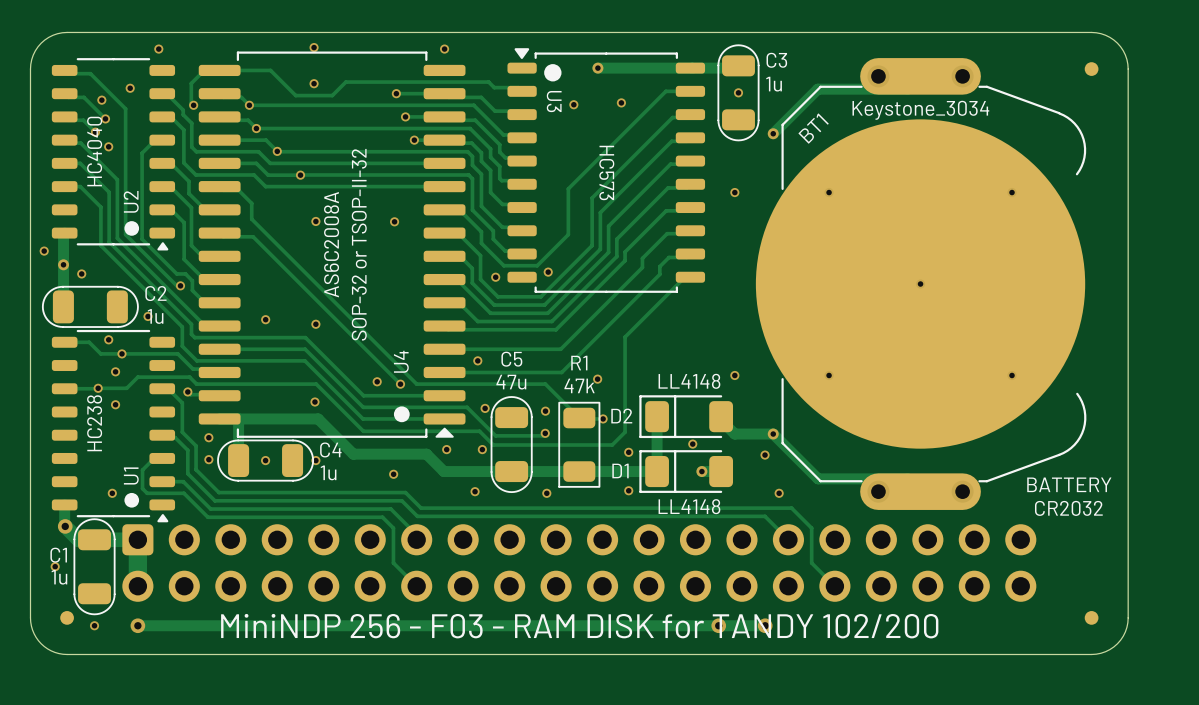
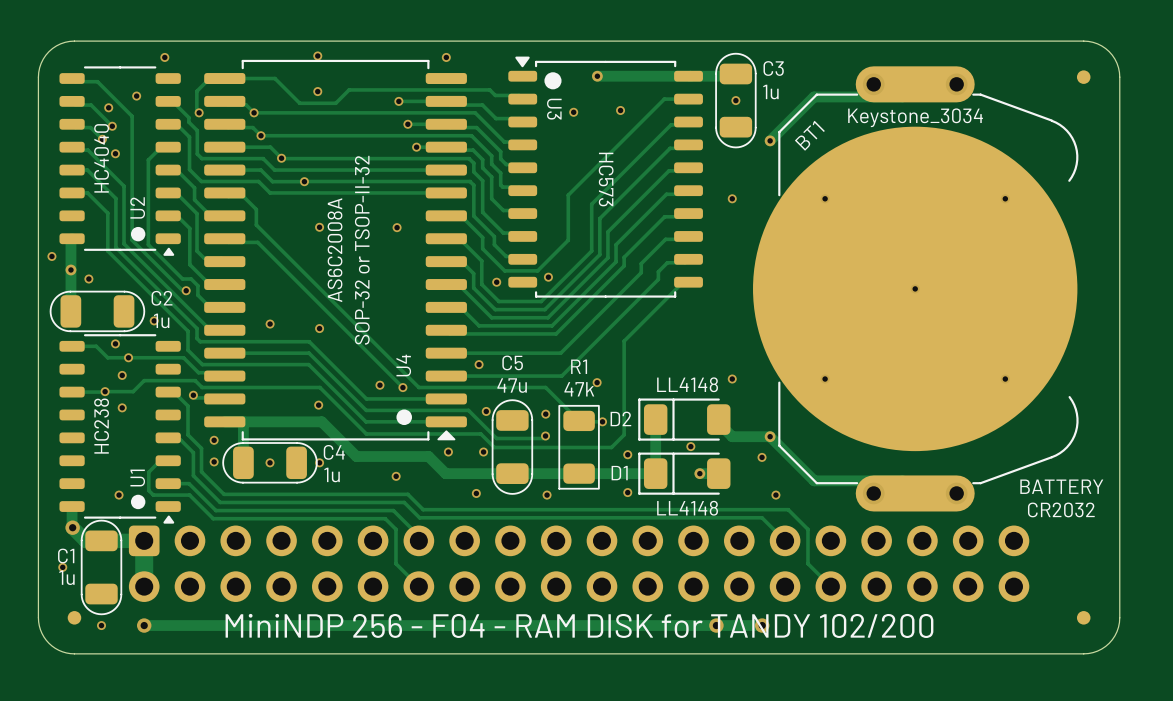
text: MiniNDP 256 - F03 - RAM DISK for TANDY 102/200 (579, 626) -> MiniNDP 256 - F04 - RAM DISK for TANDY 102/200 (579, 625)

